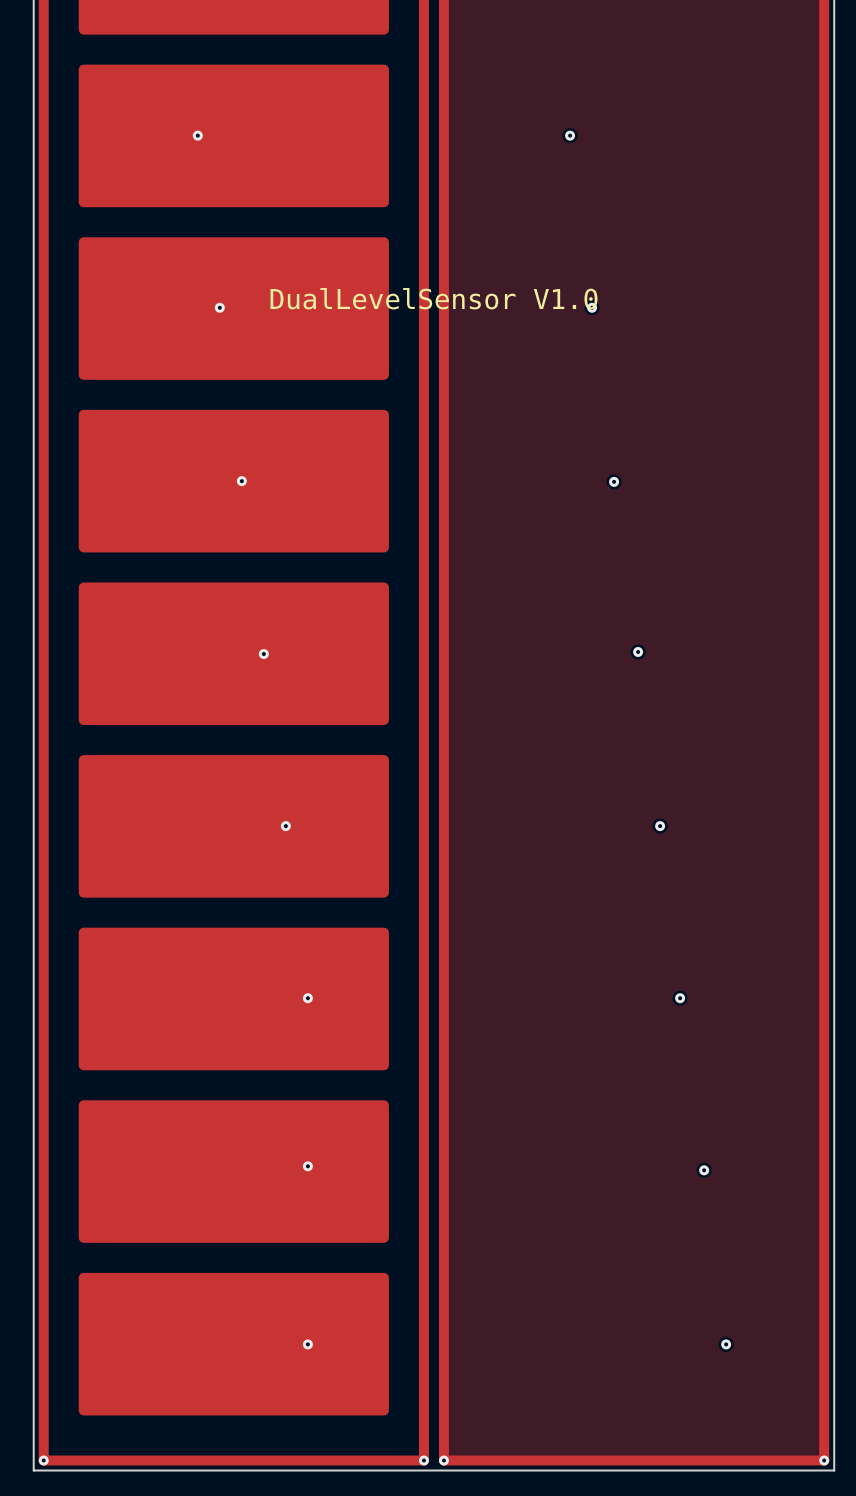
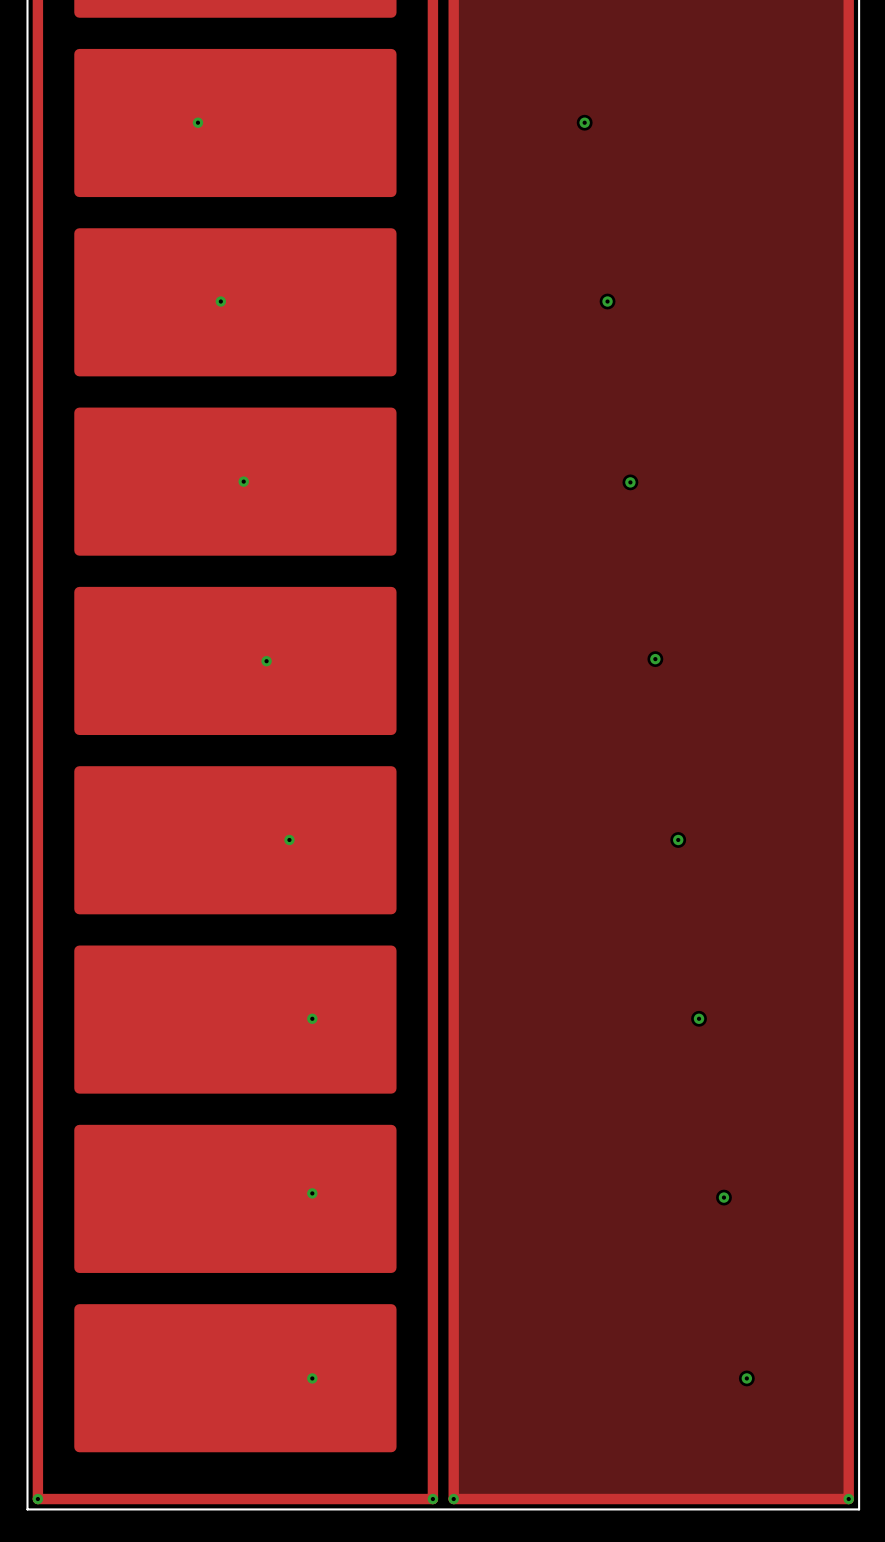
text: DualLevelSensor V1.0 (433, 298) -> none

